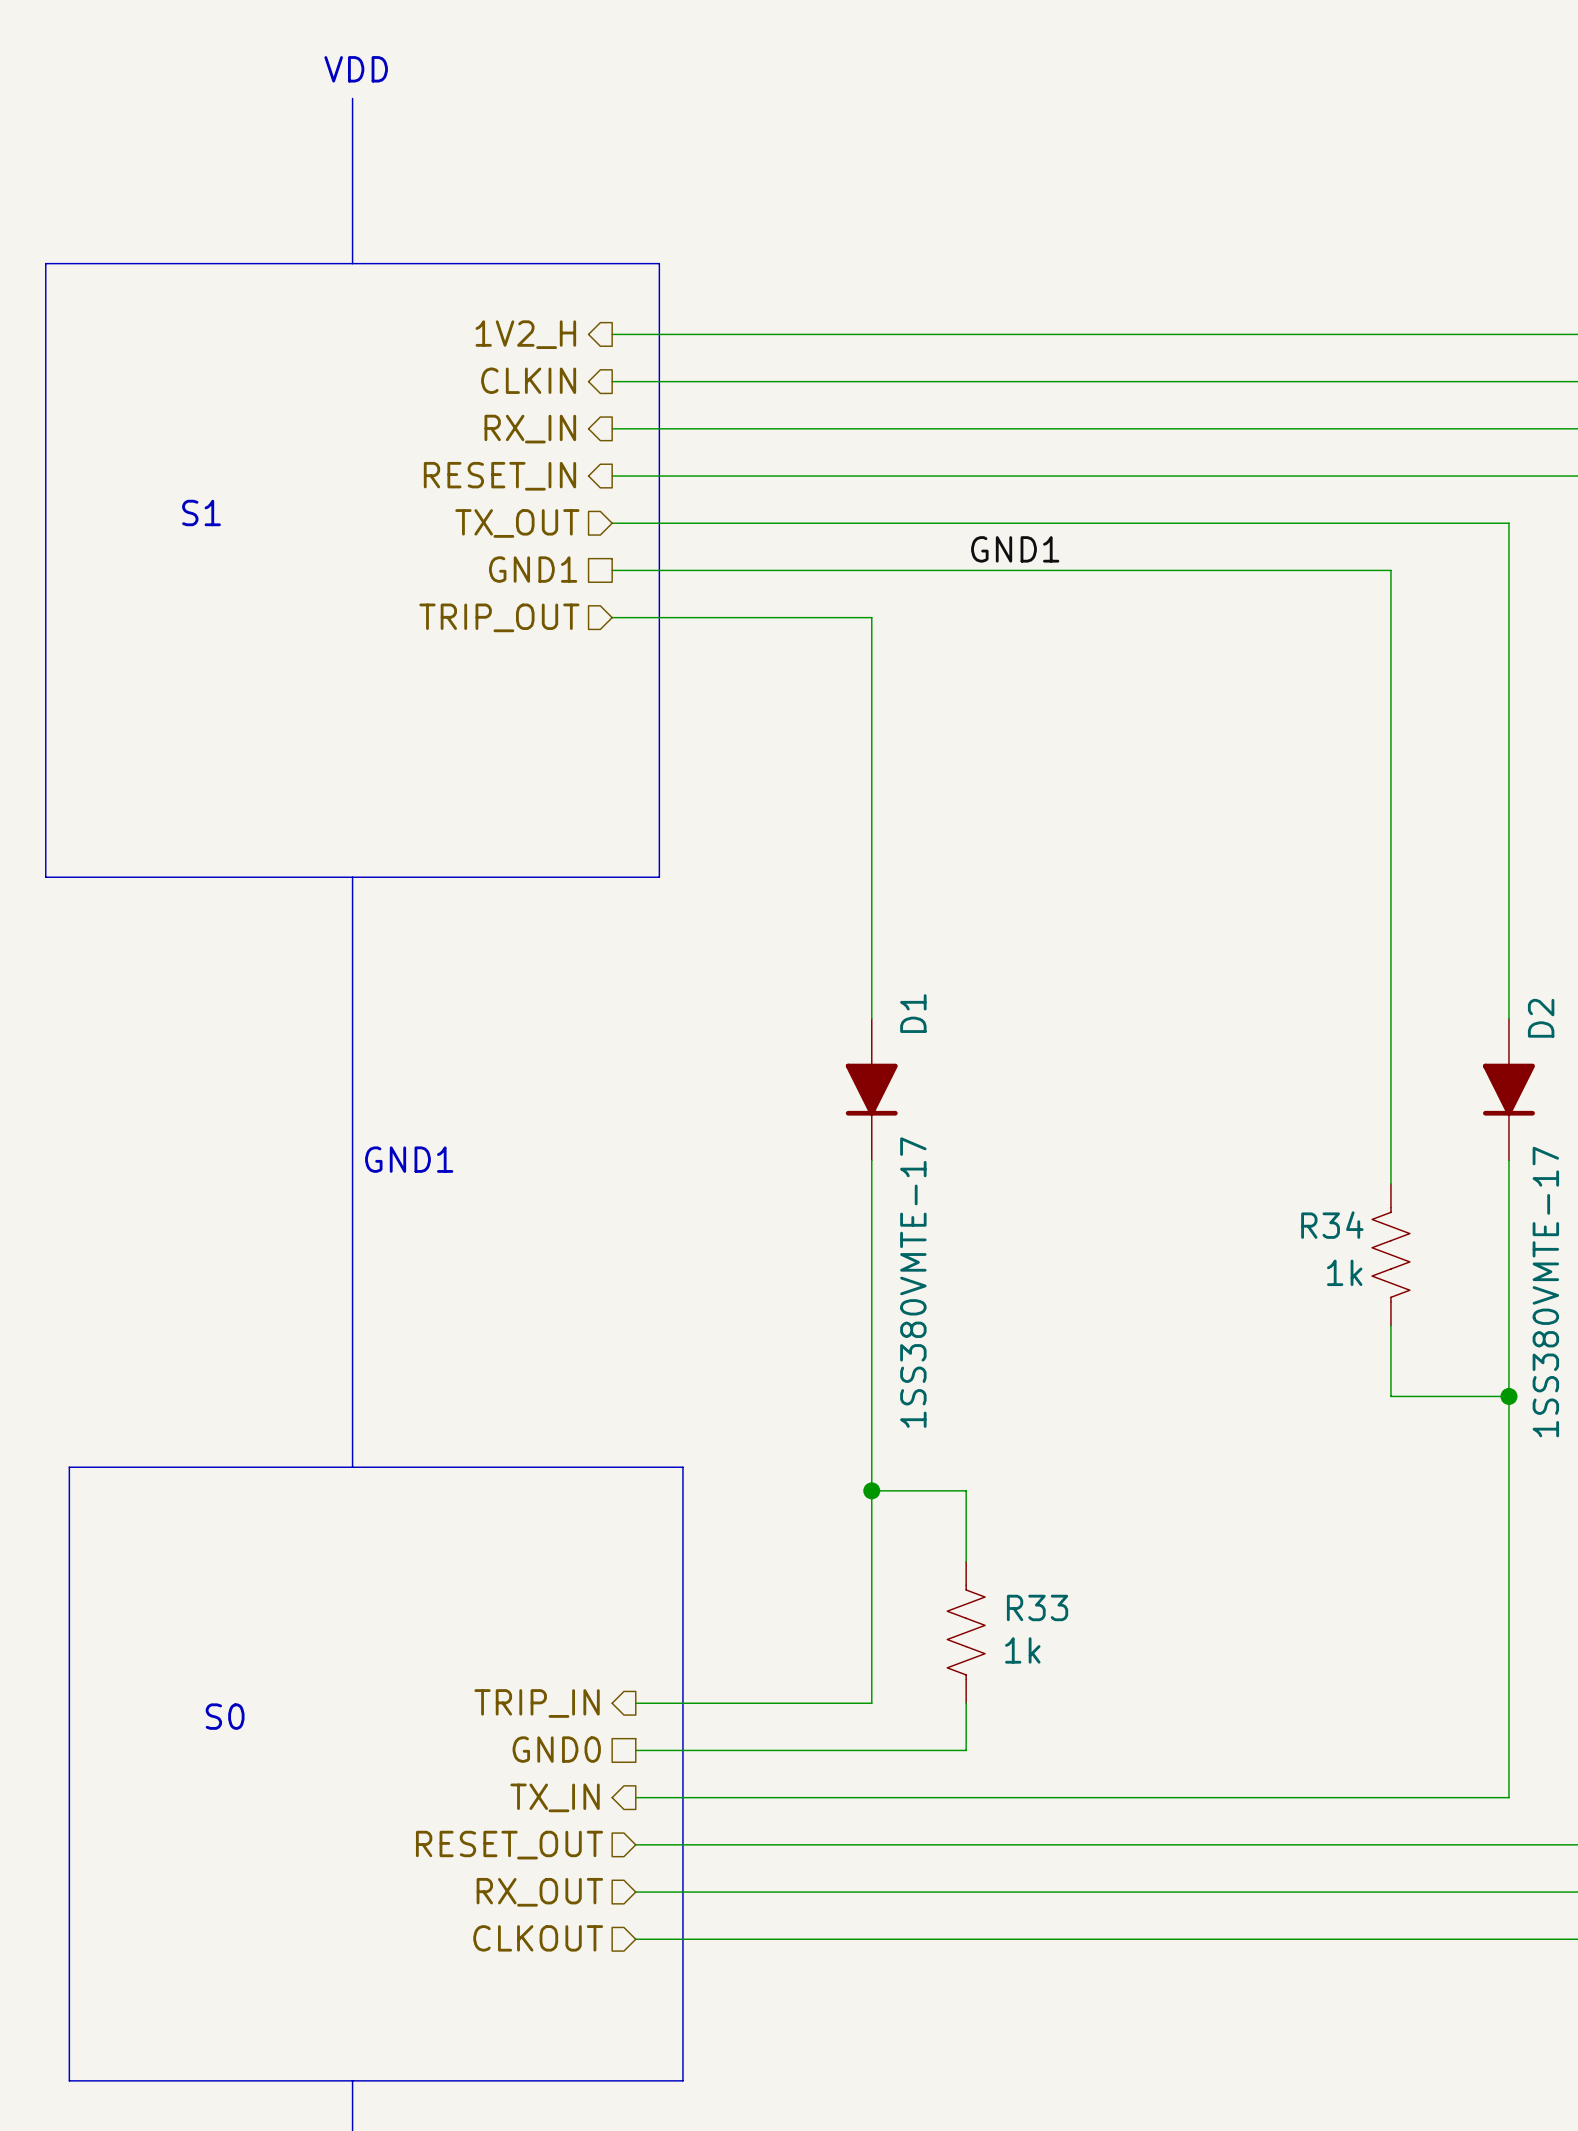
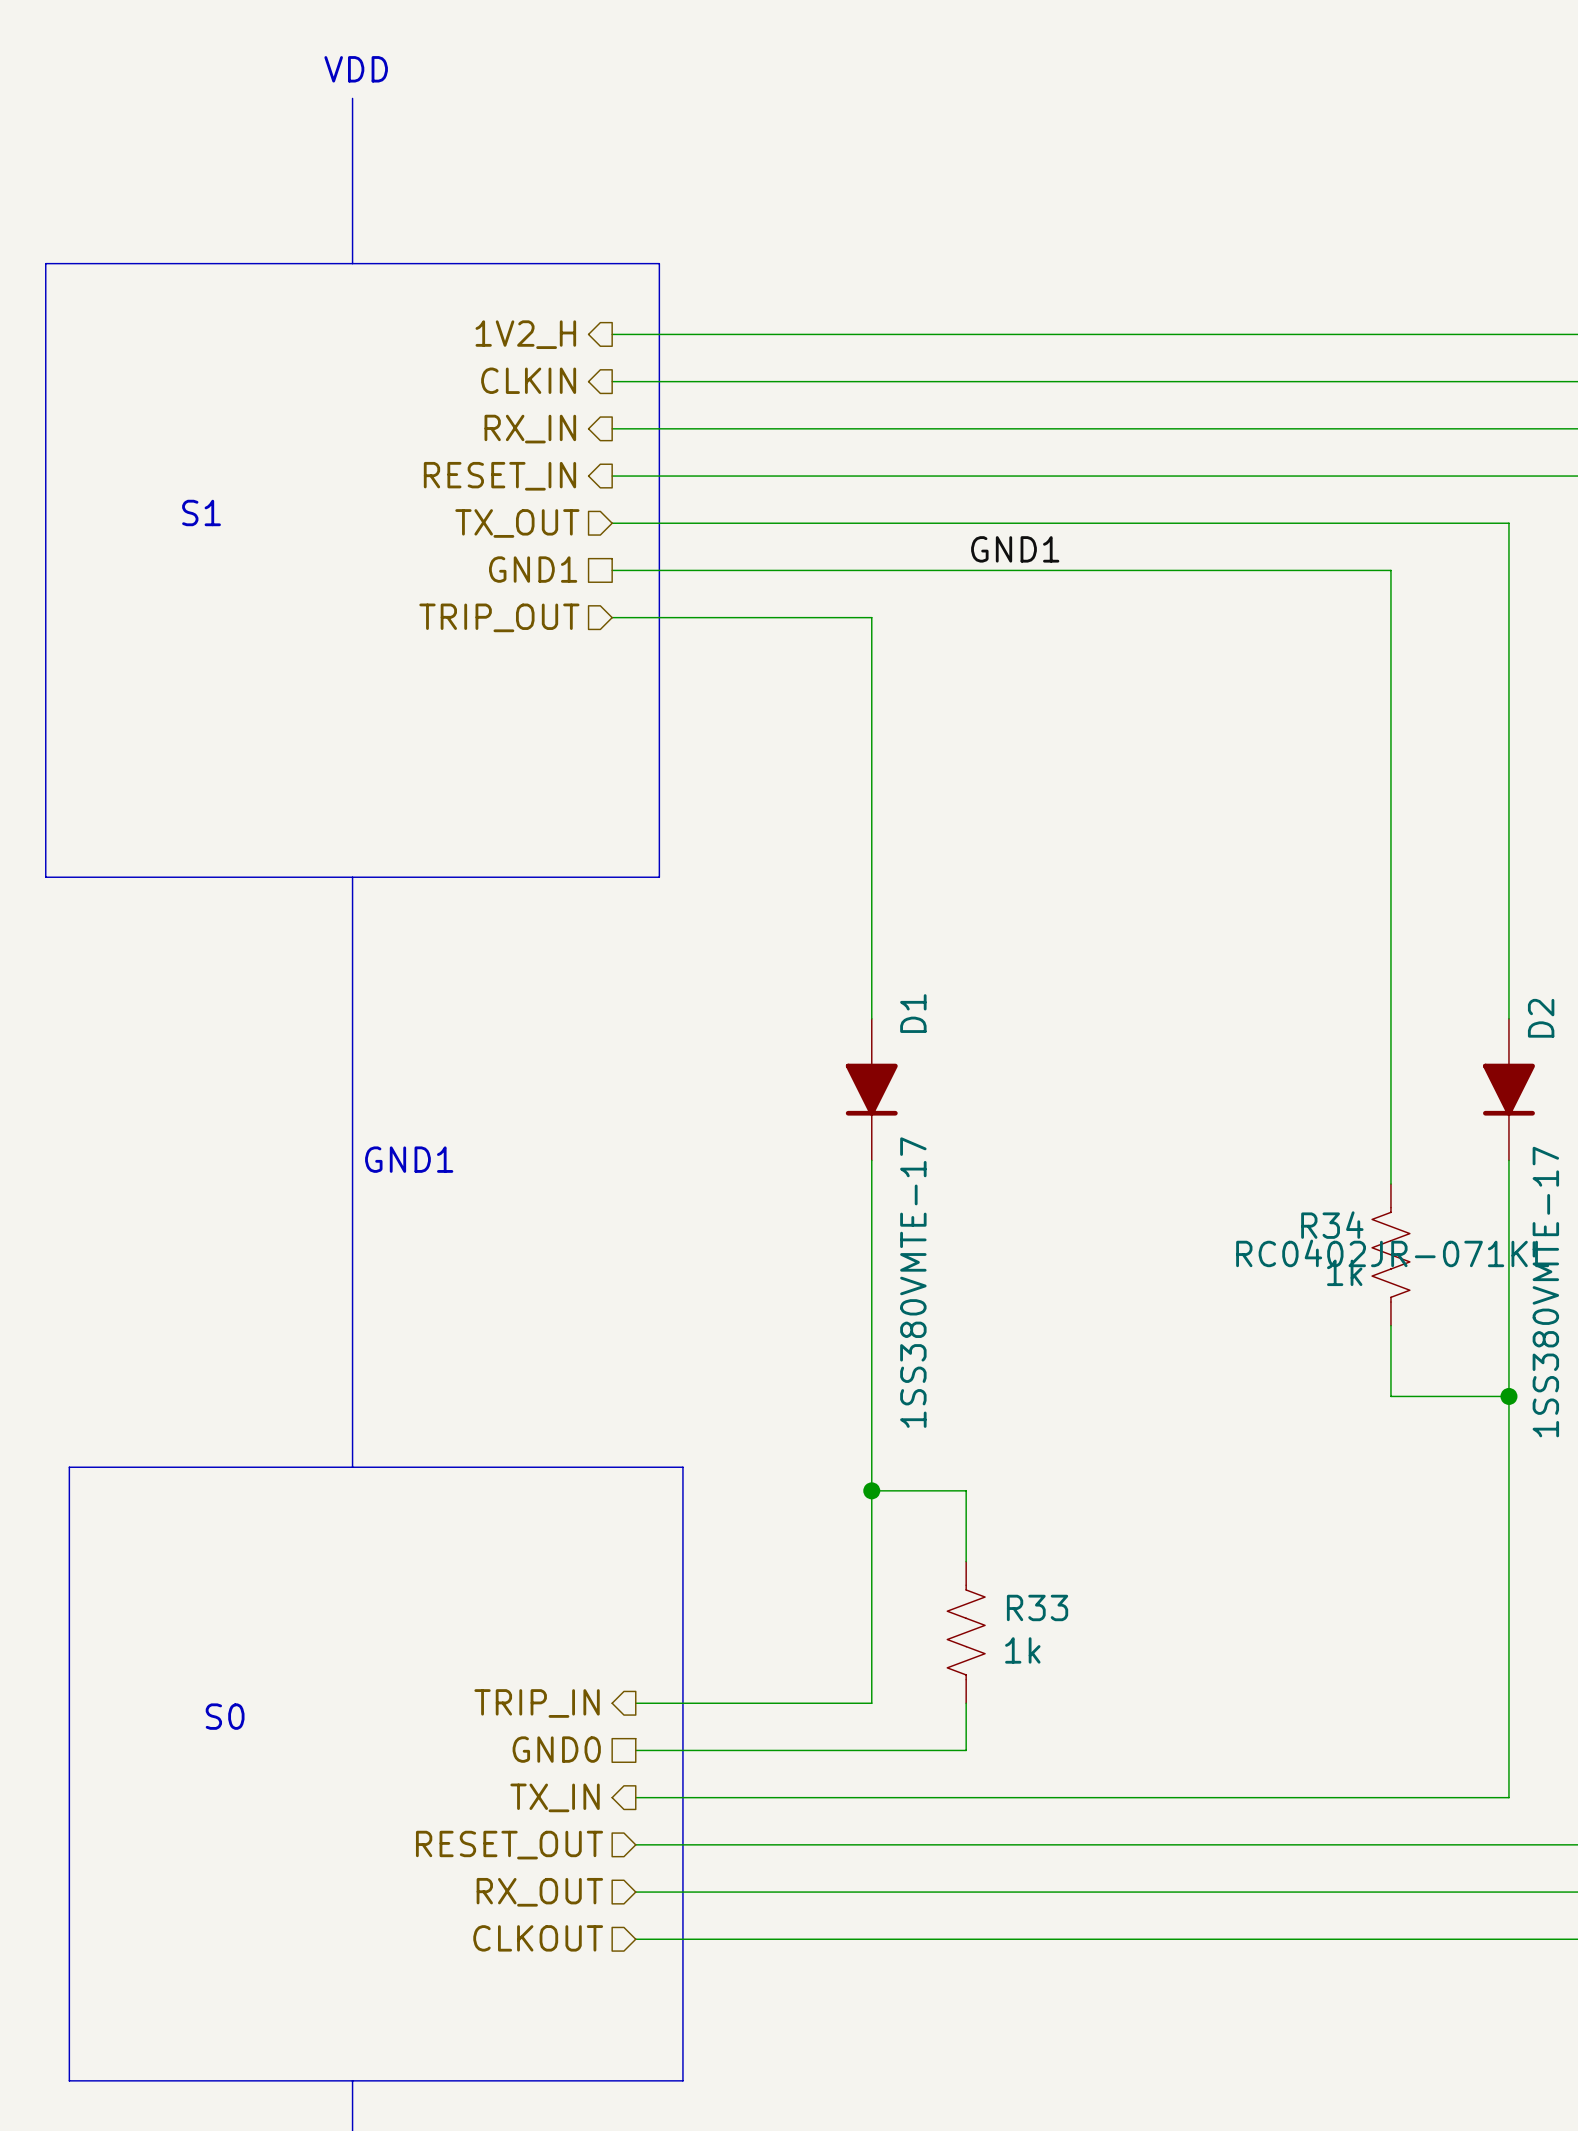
R34 text: none -> RC0402JR-071KL (1392, 1253)

